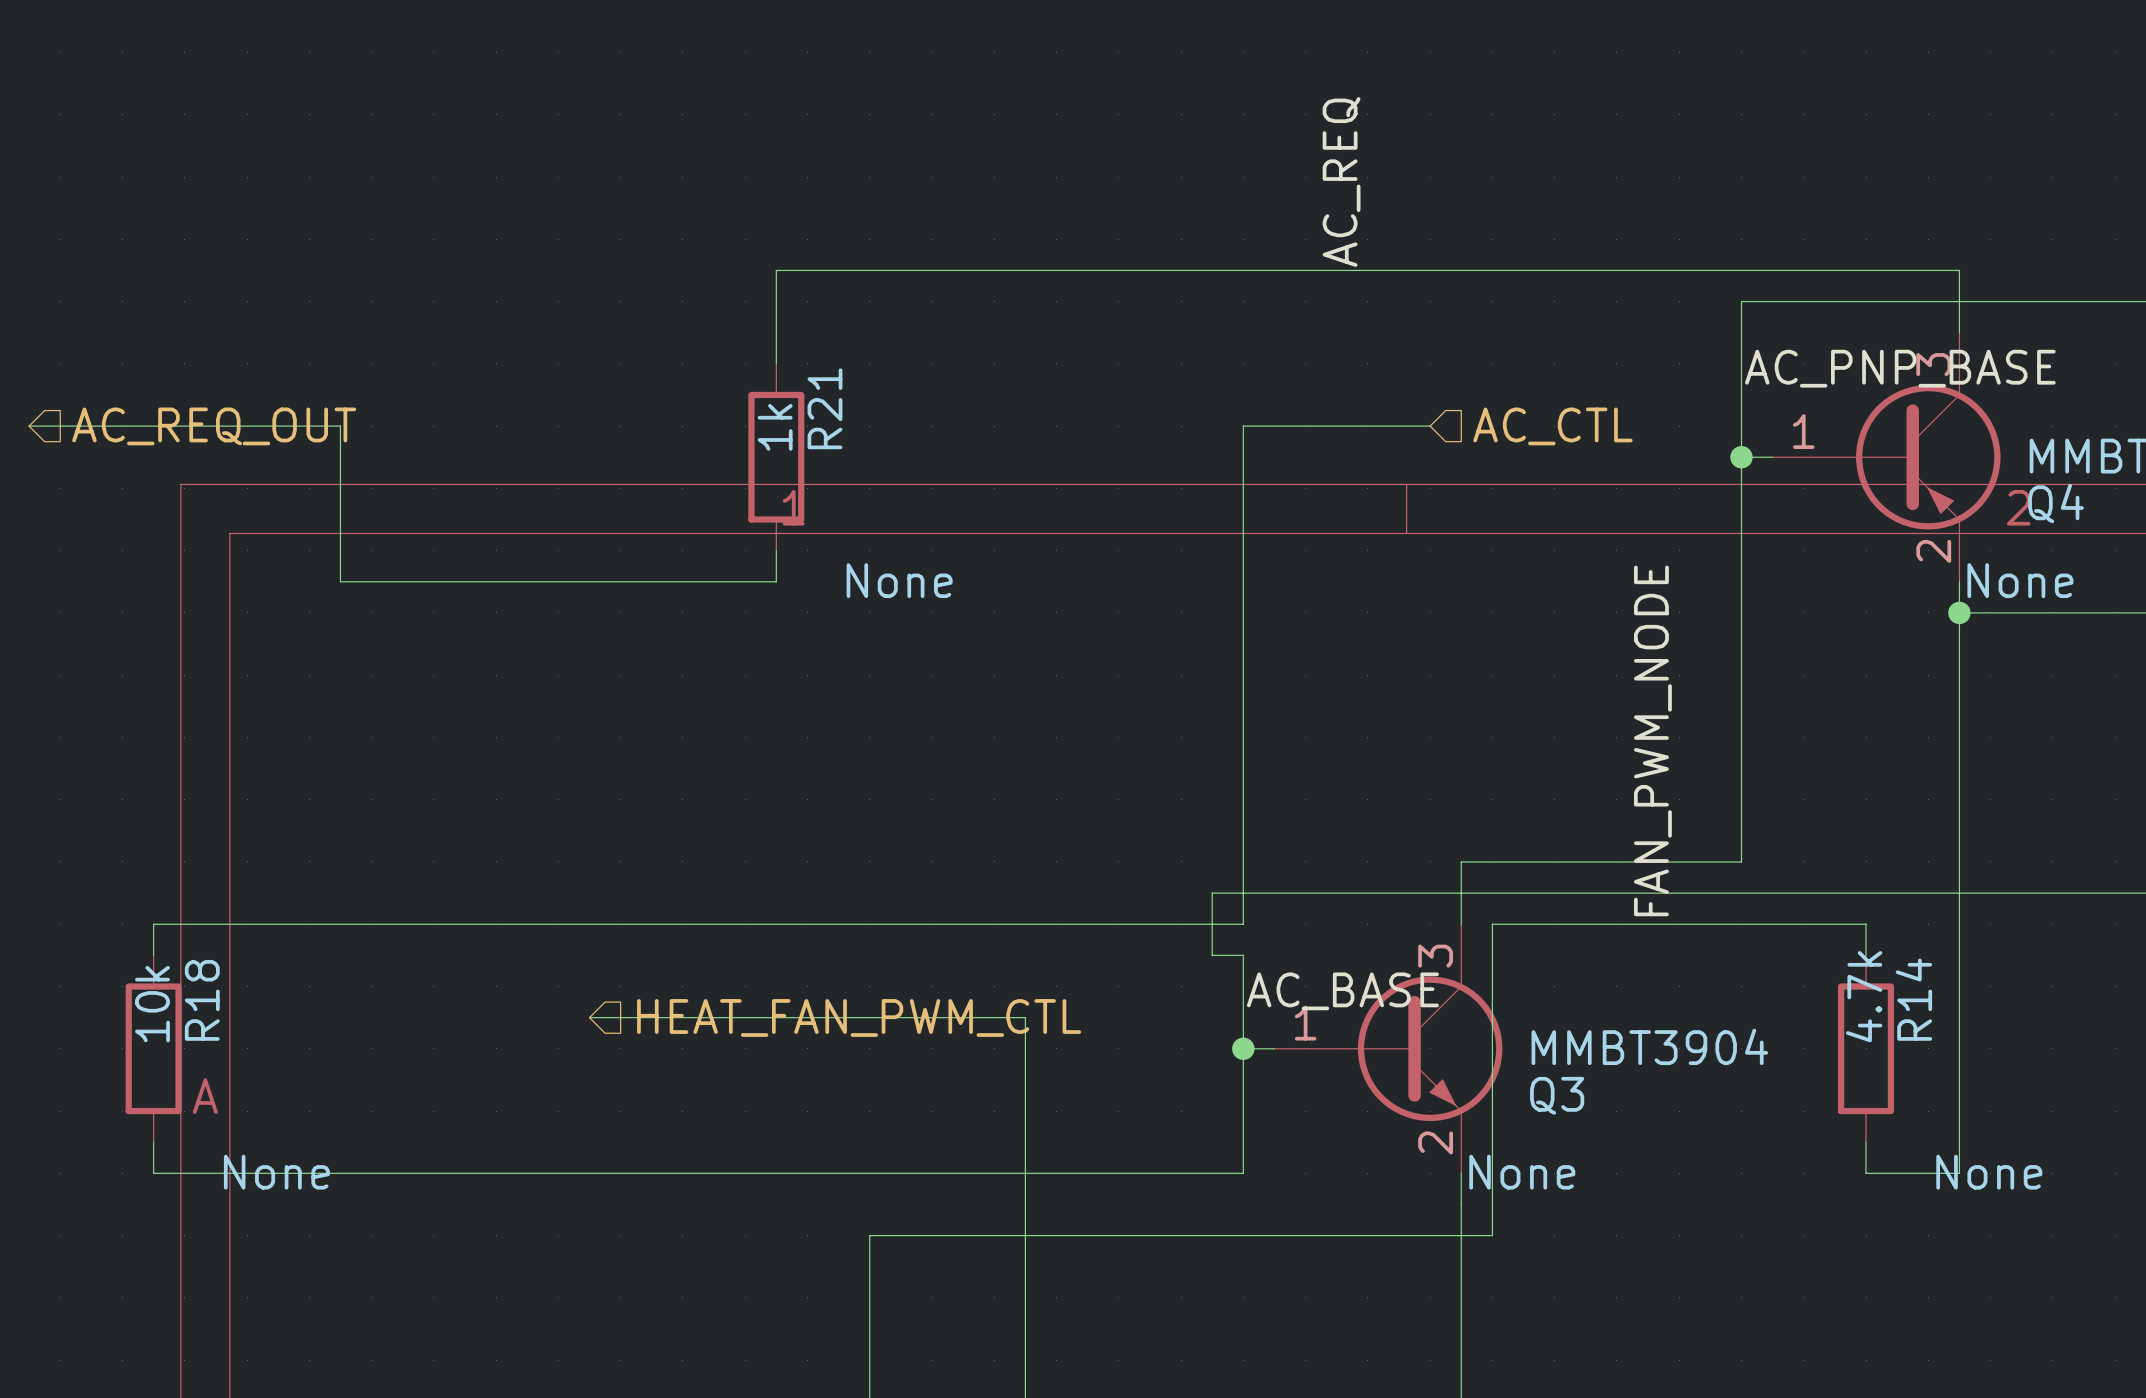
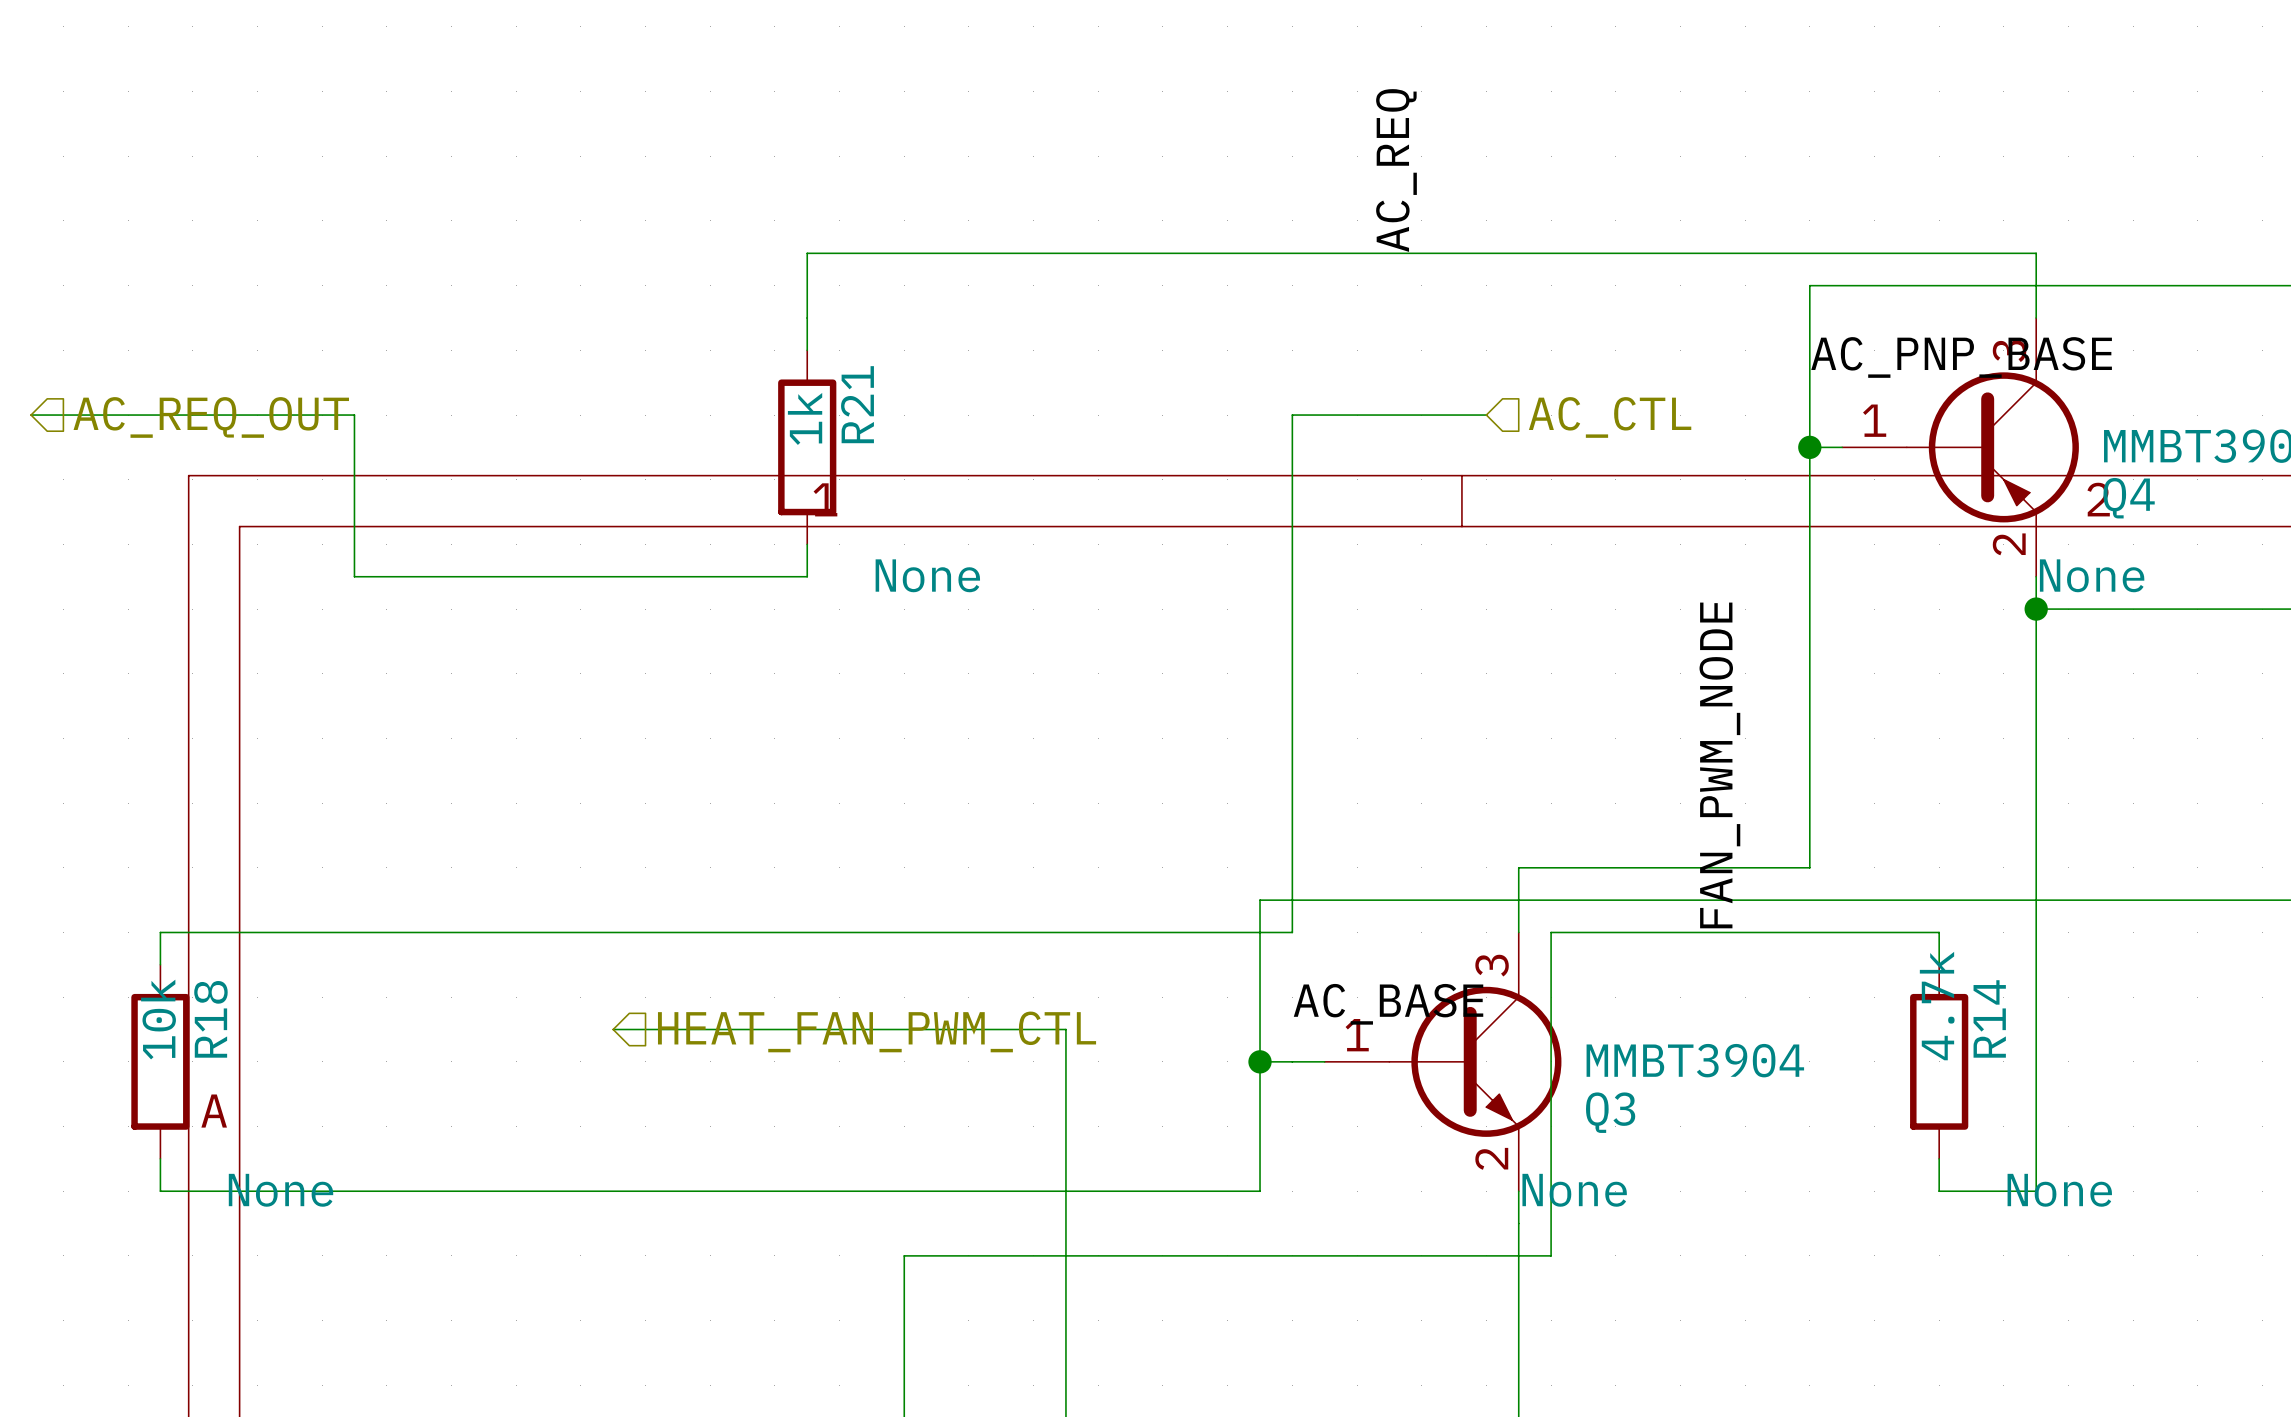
wire: (1212, 955) (1243, 955) (1243, 1173) (1212, 1173) -> (1260, 964) (1260, 1191)
wire: none -> (1260, 1061) (1292, 1061)
junction position: (1243, 1048) -> (1260, 1061)

